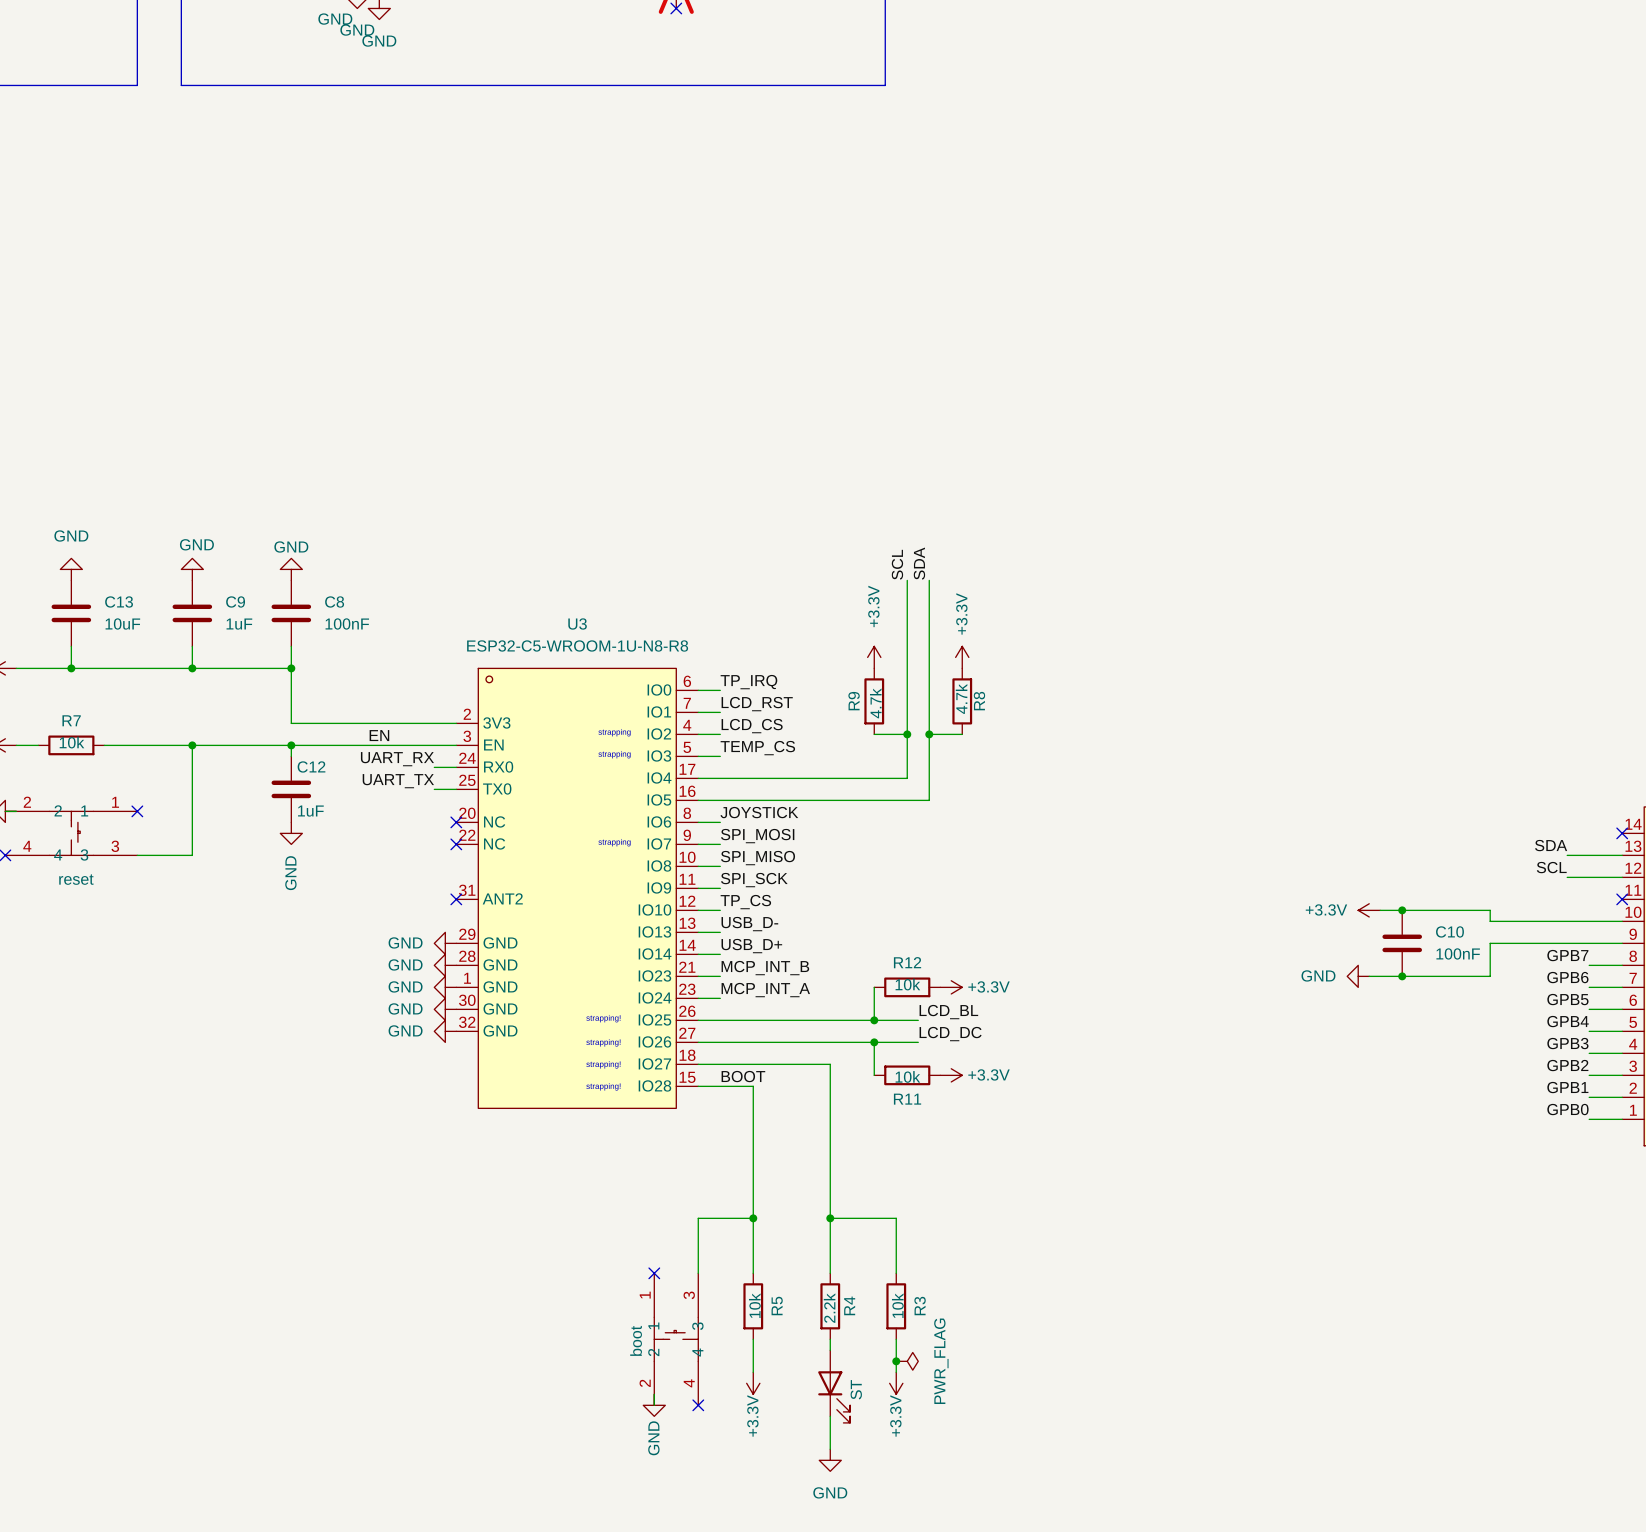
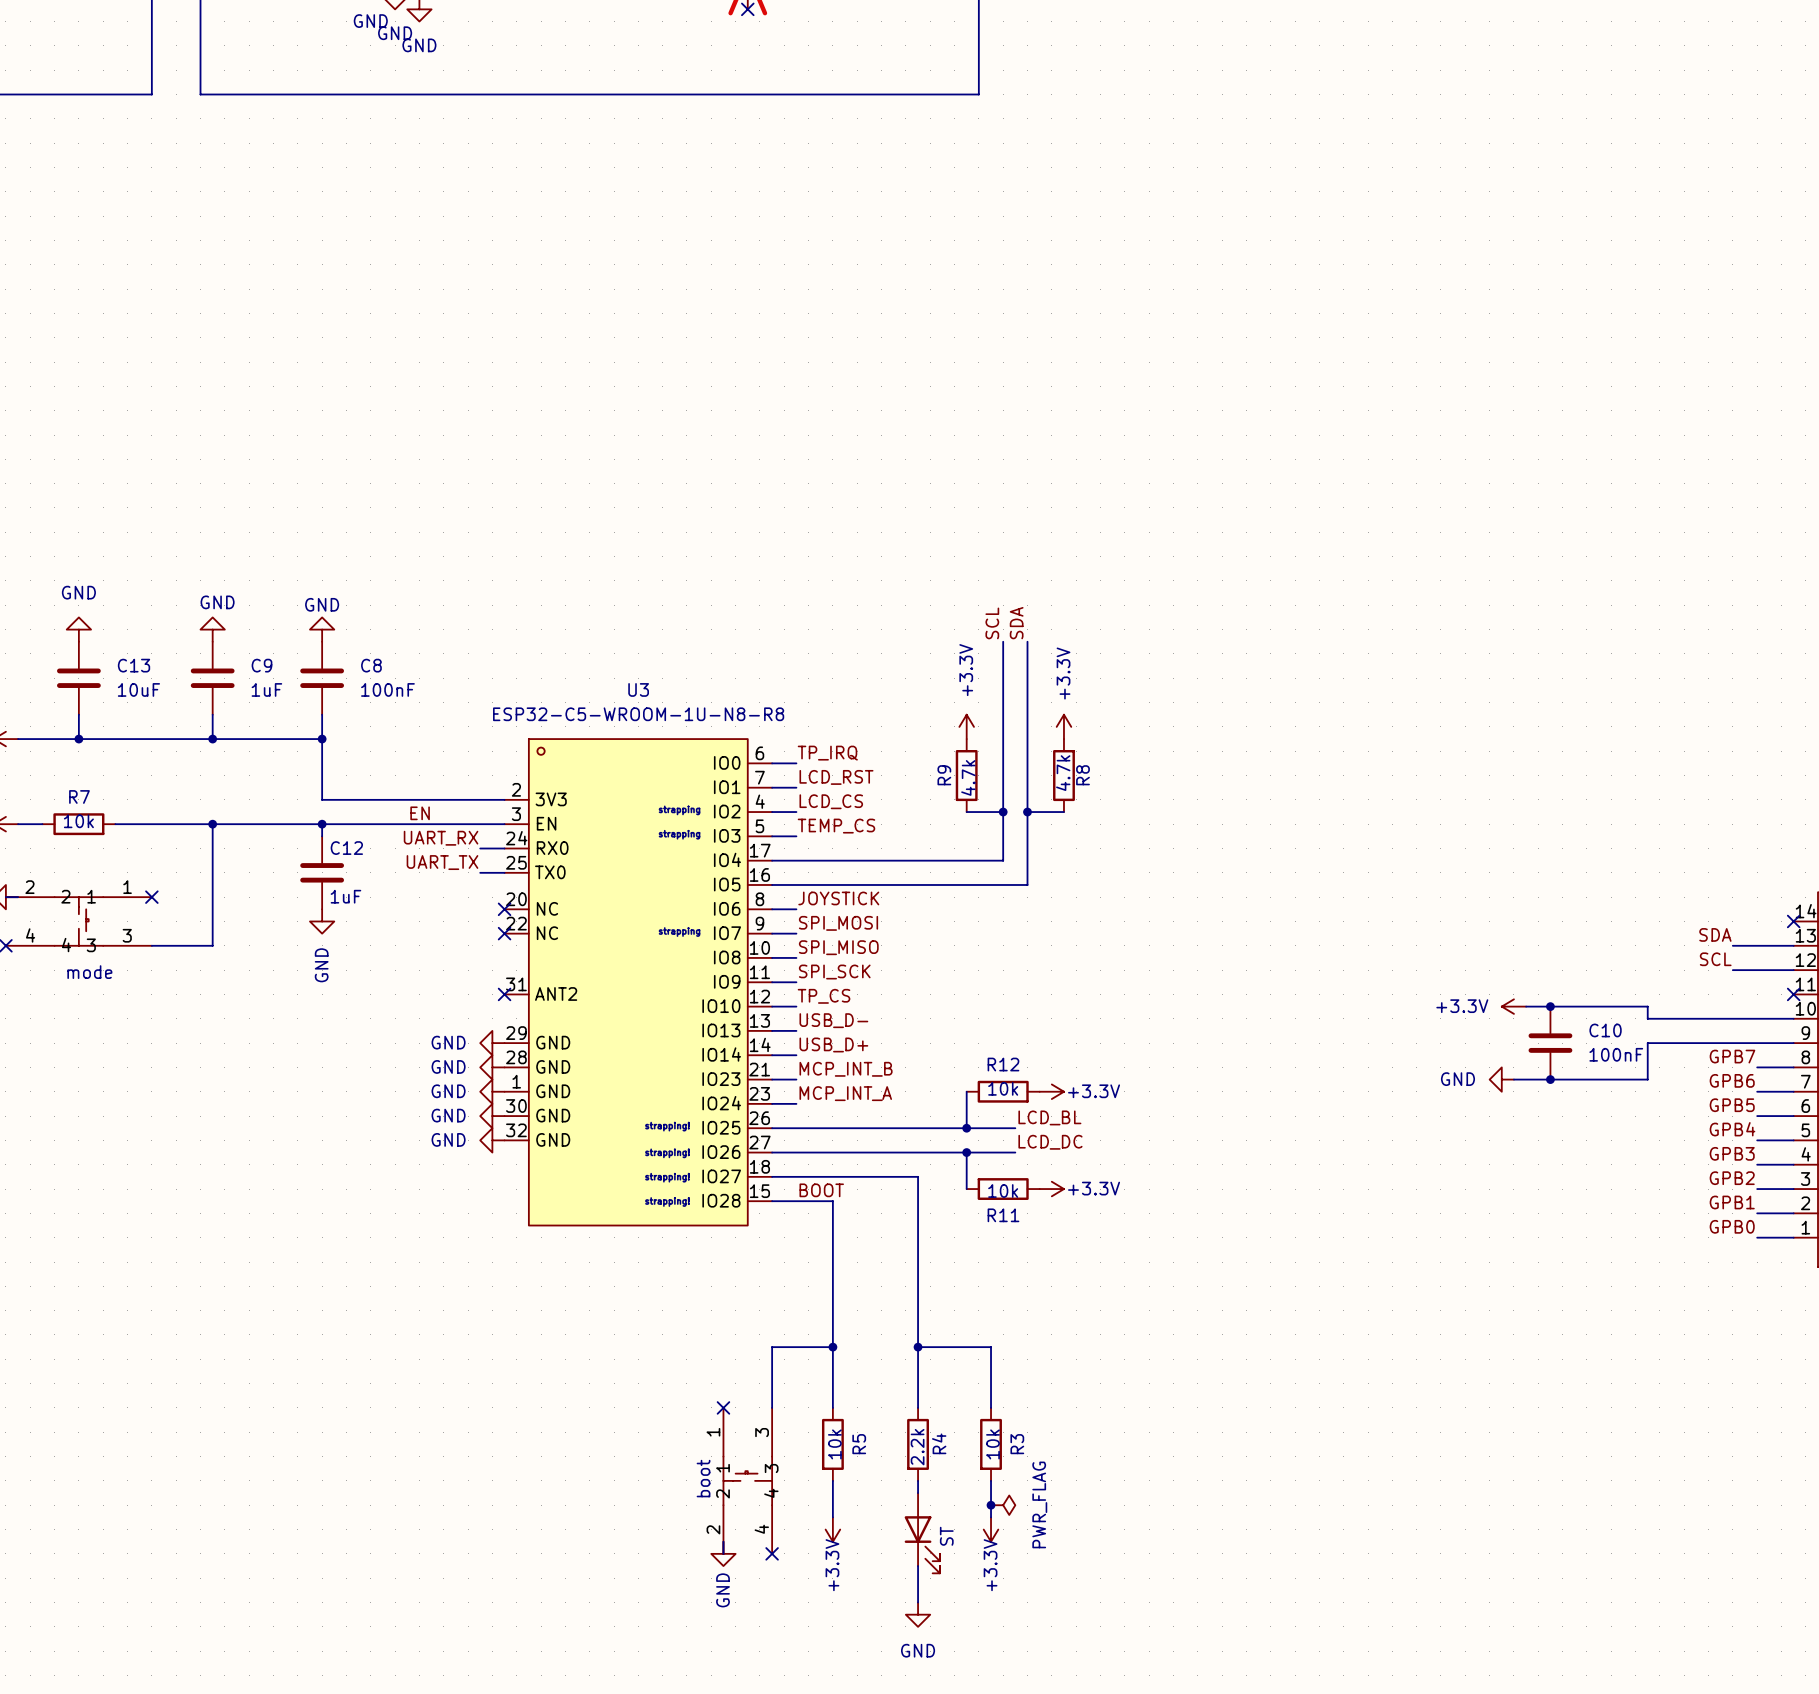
part value: reset (76, 879) -> mode (89, 972)

